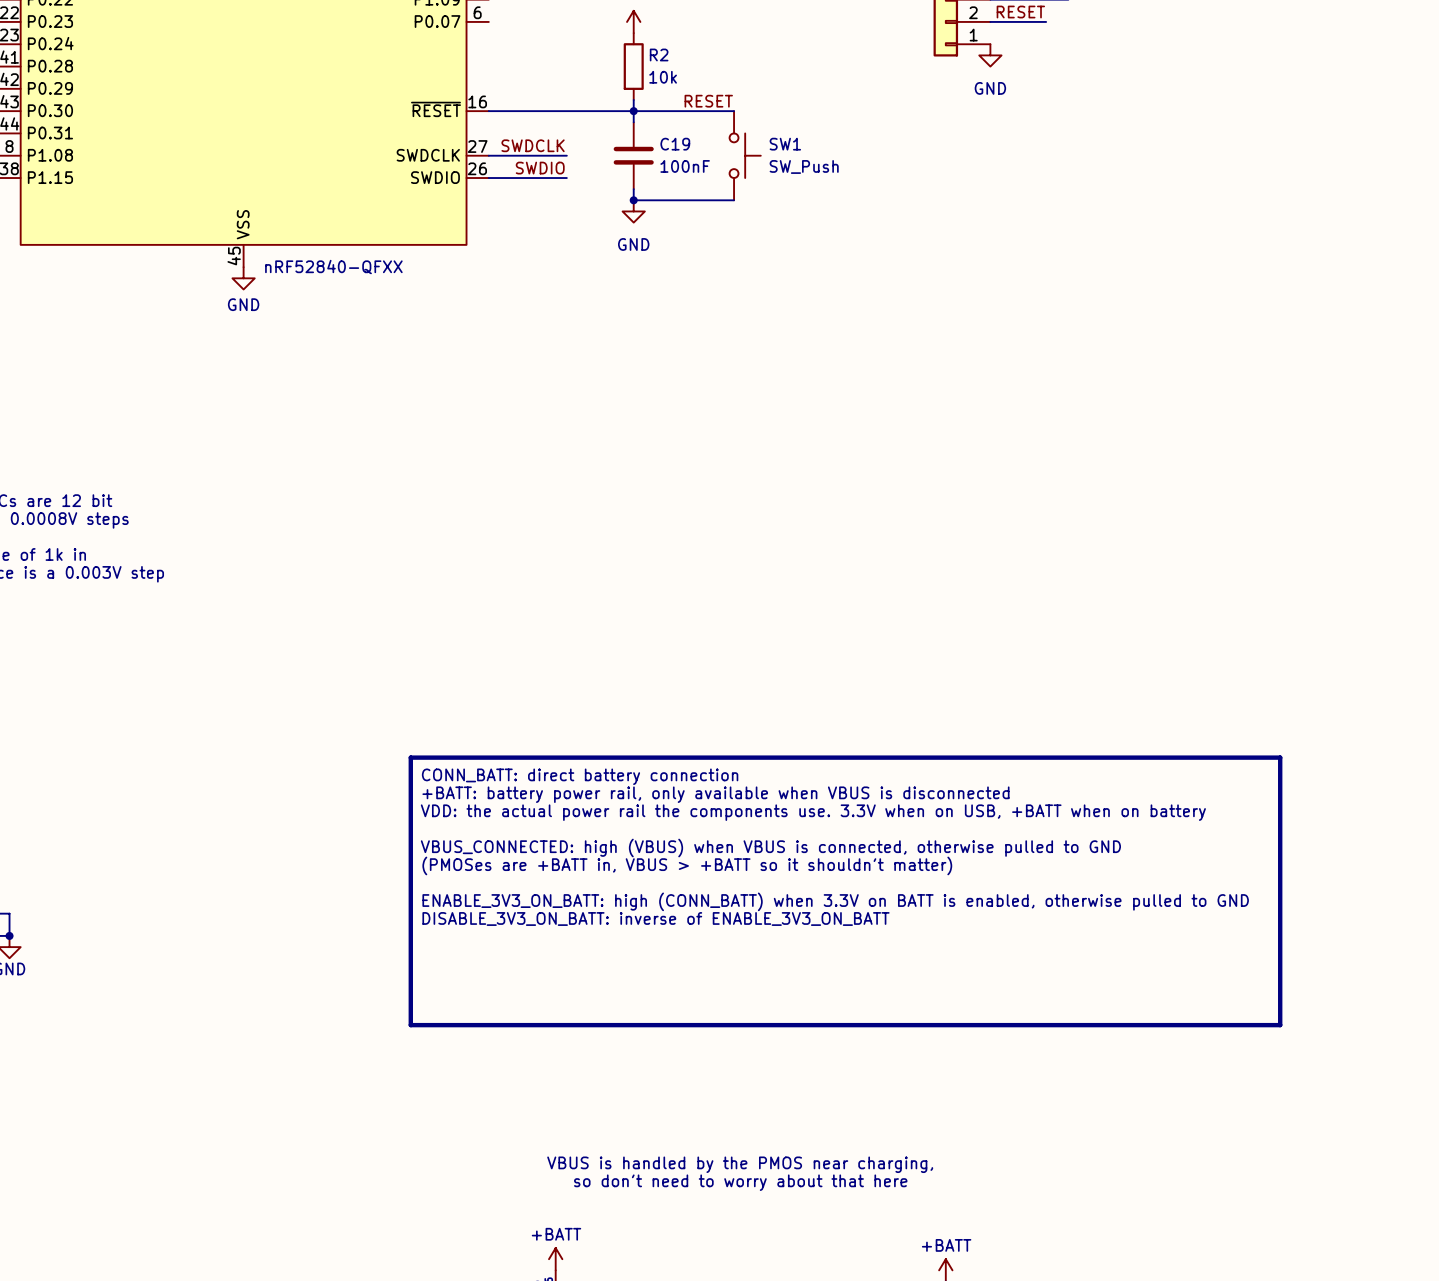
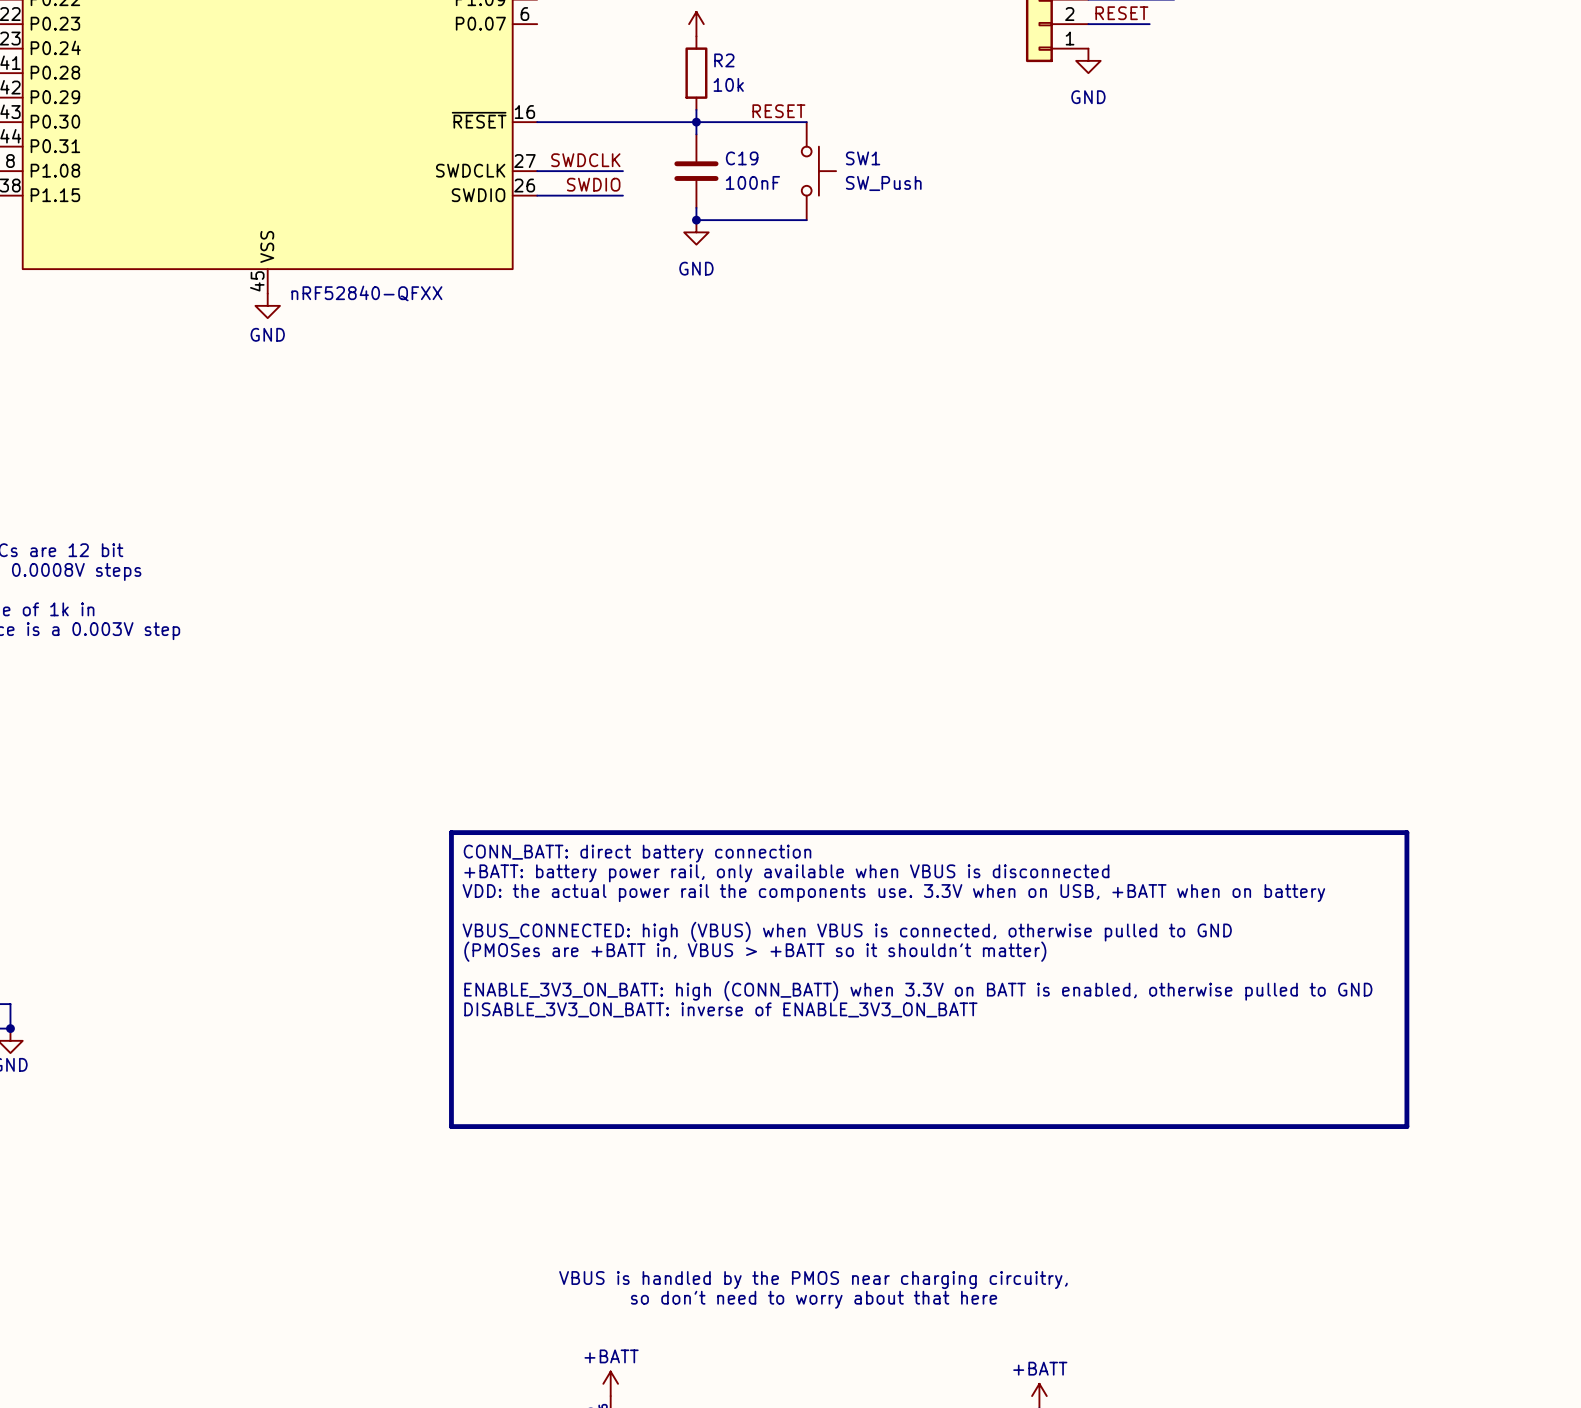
text: VBUS is handled by the PMOS near charging, (740, 1164) -> VBUS is handled by the PMOS near charging circuitry, (813, 1280)

